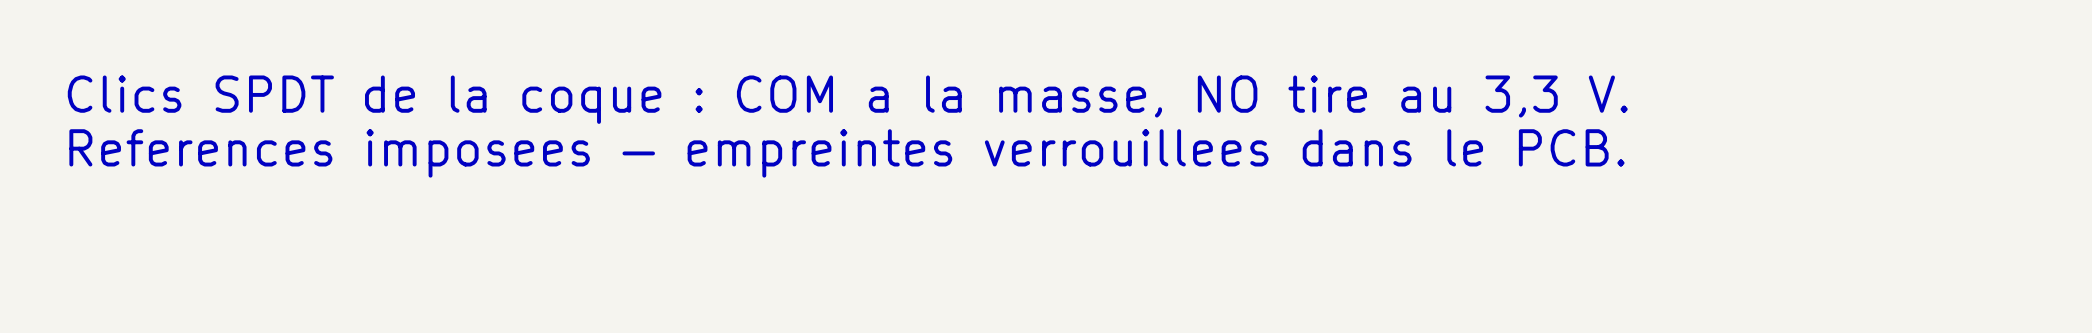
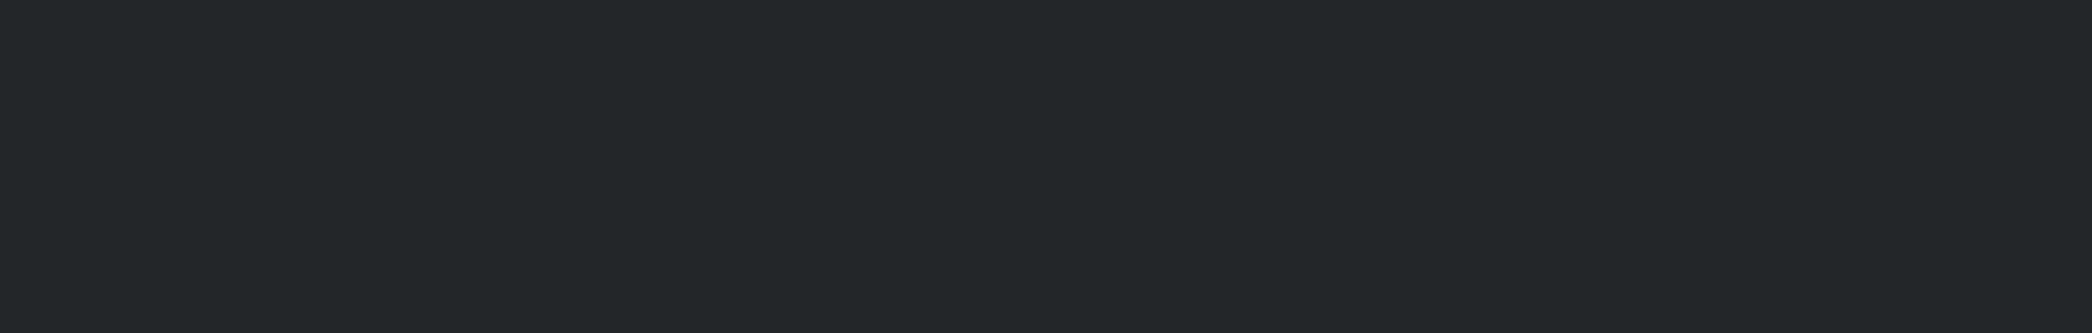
text: Clics SPDT de la coque : COM a la masse, NO tire au 3,3 V. (847, 99) -> none
text: References imposees — empreintes verrouillees dans le PCB. (846, 153) -> none

